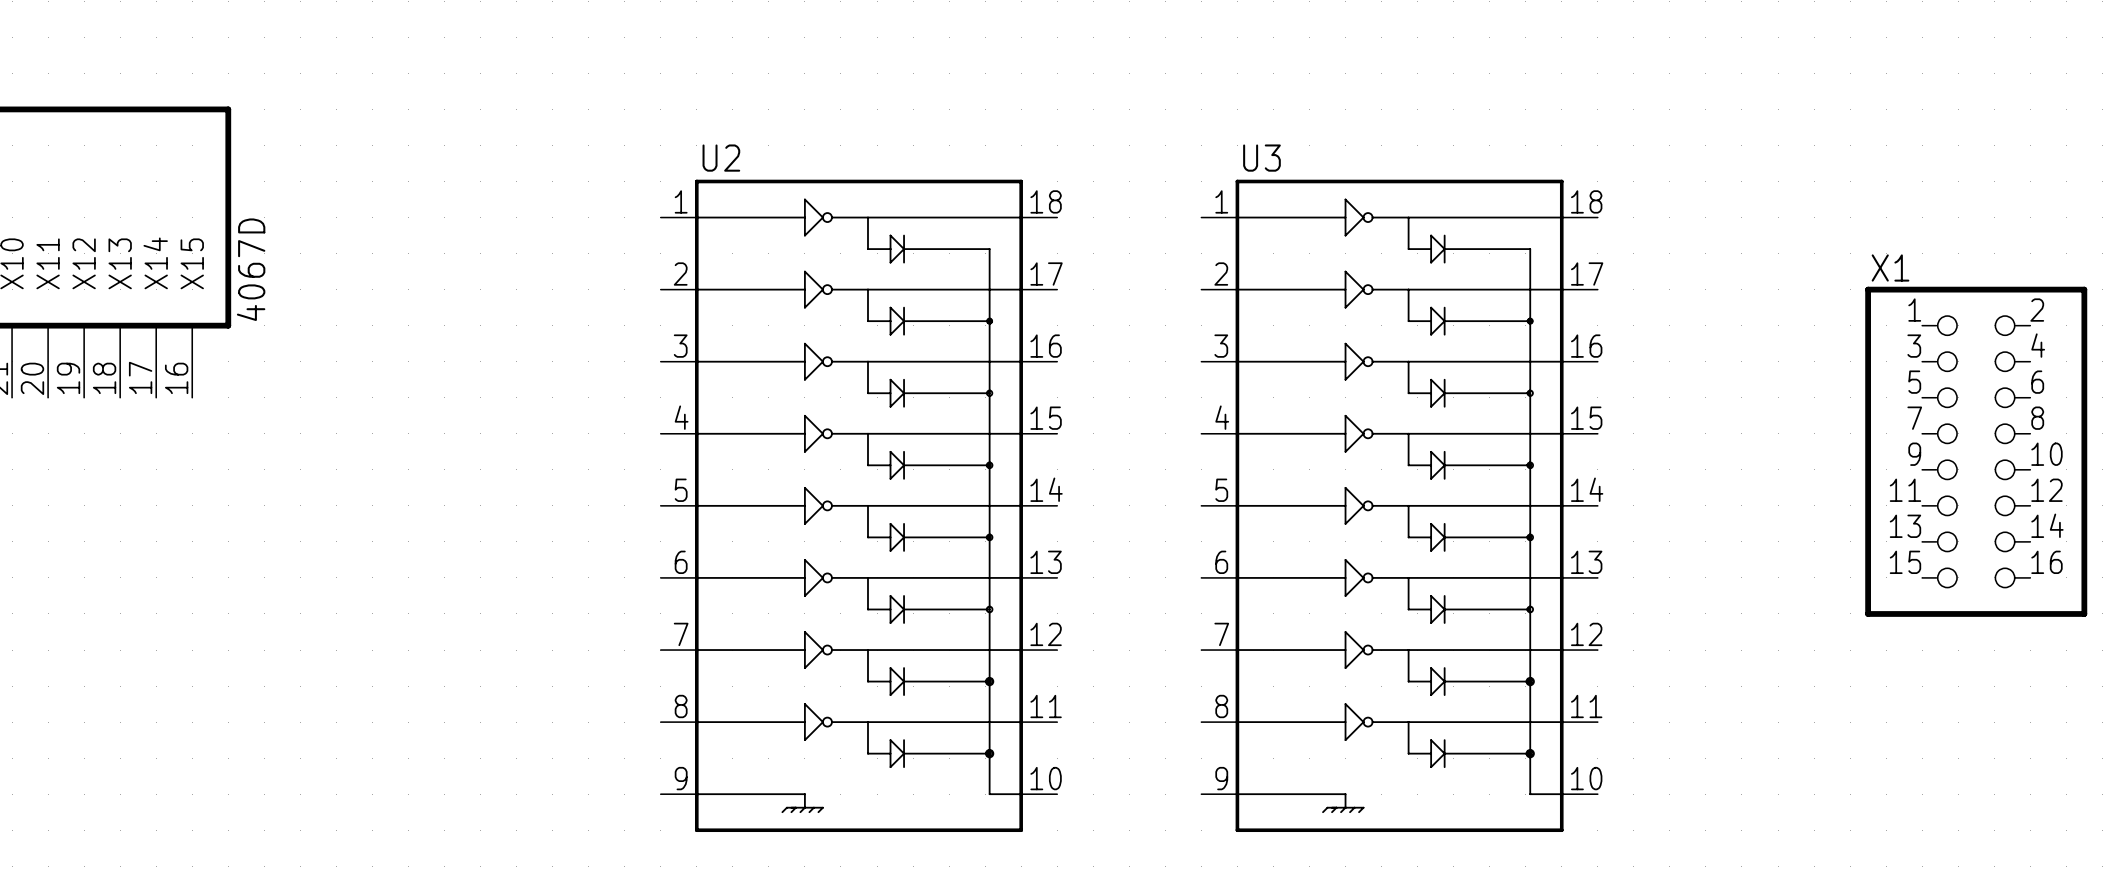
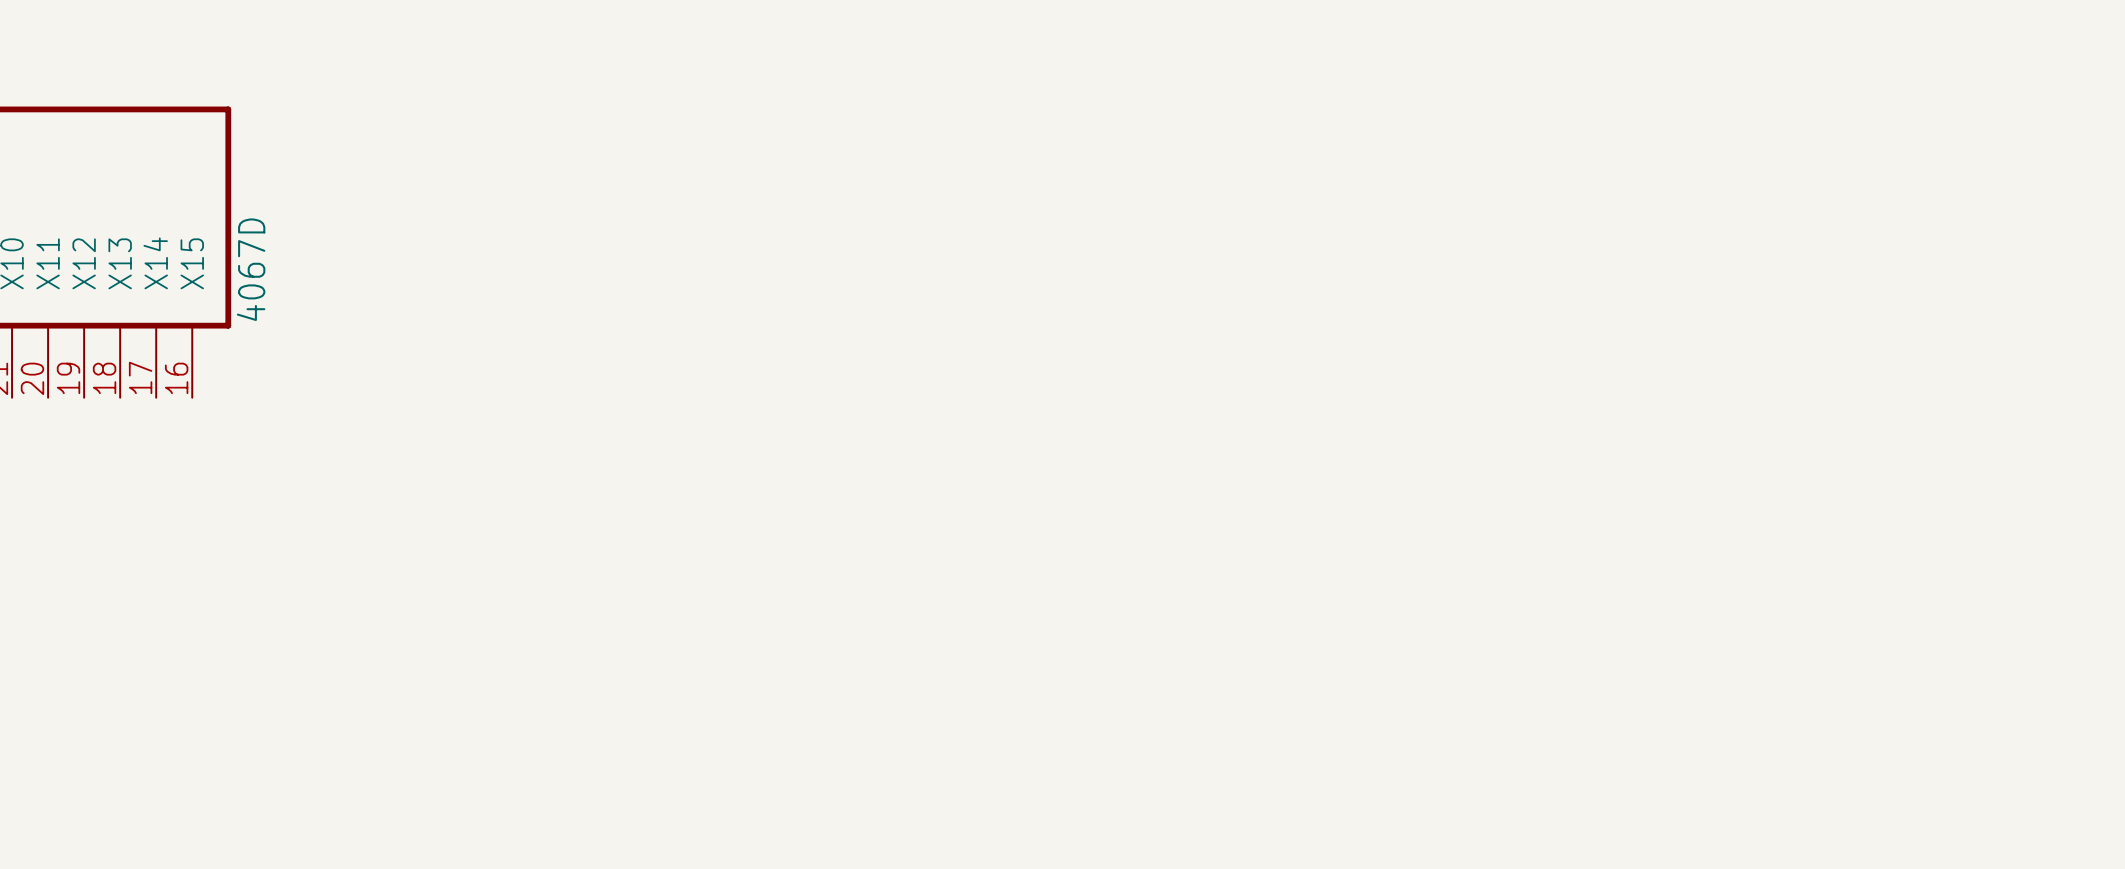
X1: (1976, 451) -> none
U2: (858, 505) -> none
U3: (1399, 505) -> none

